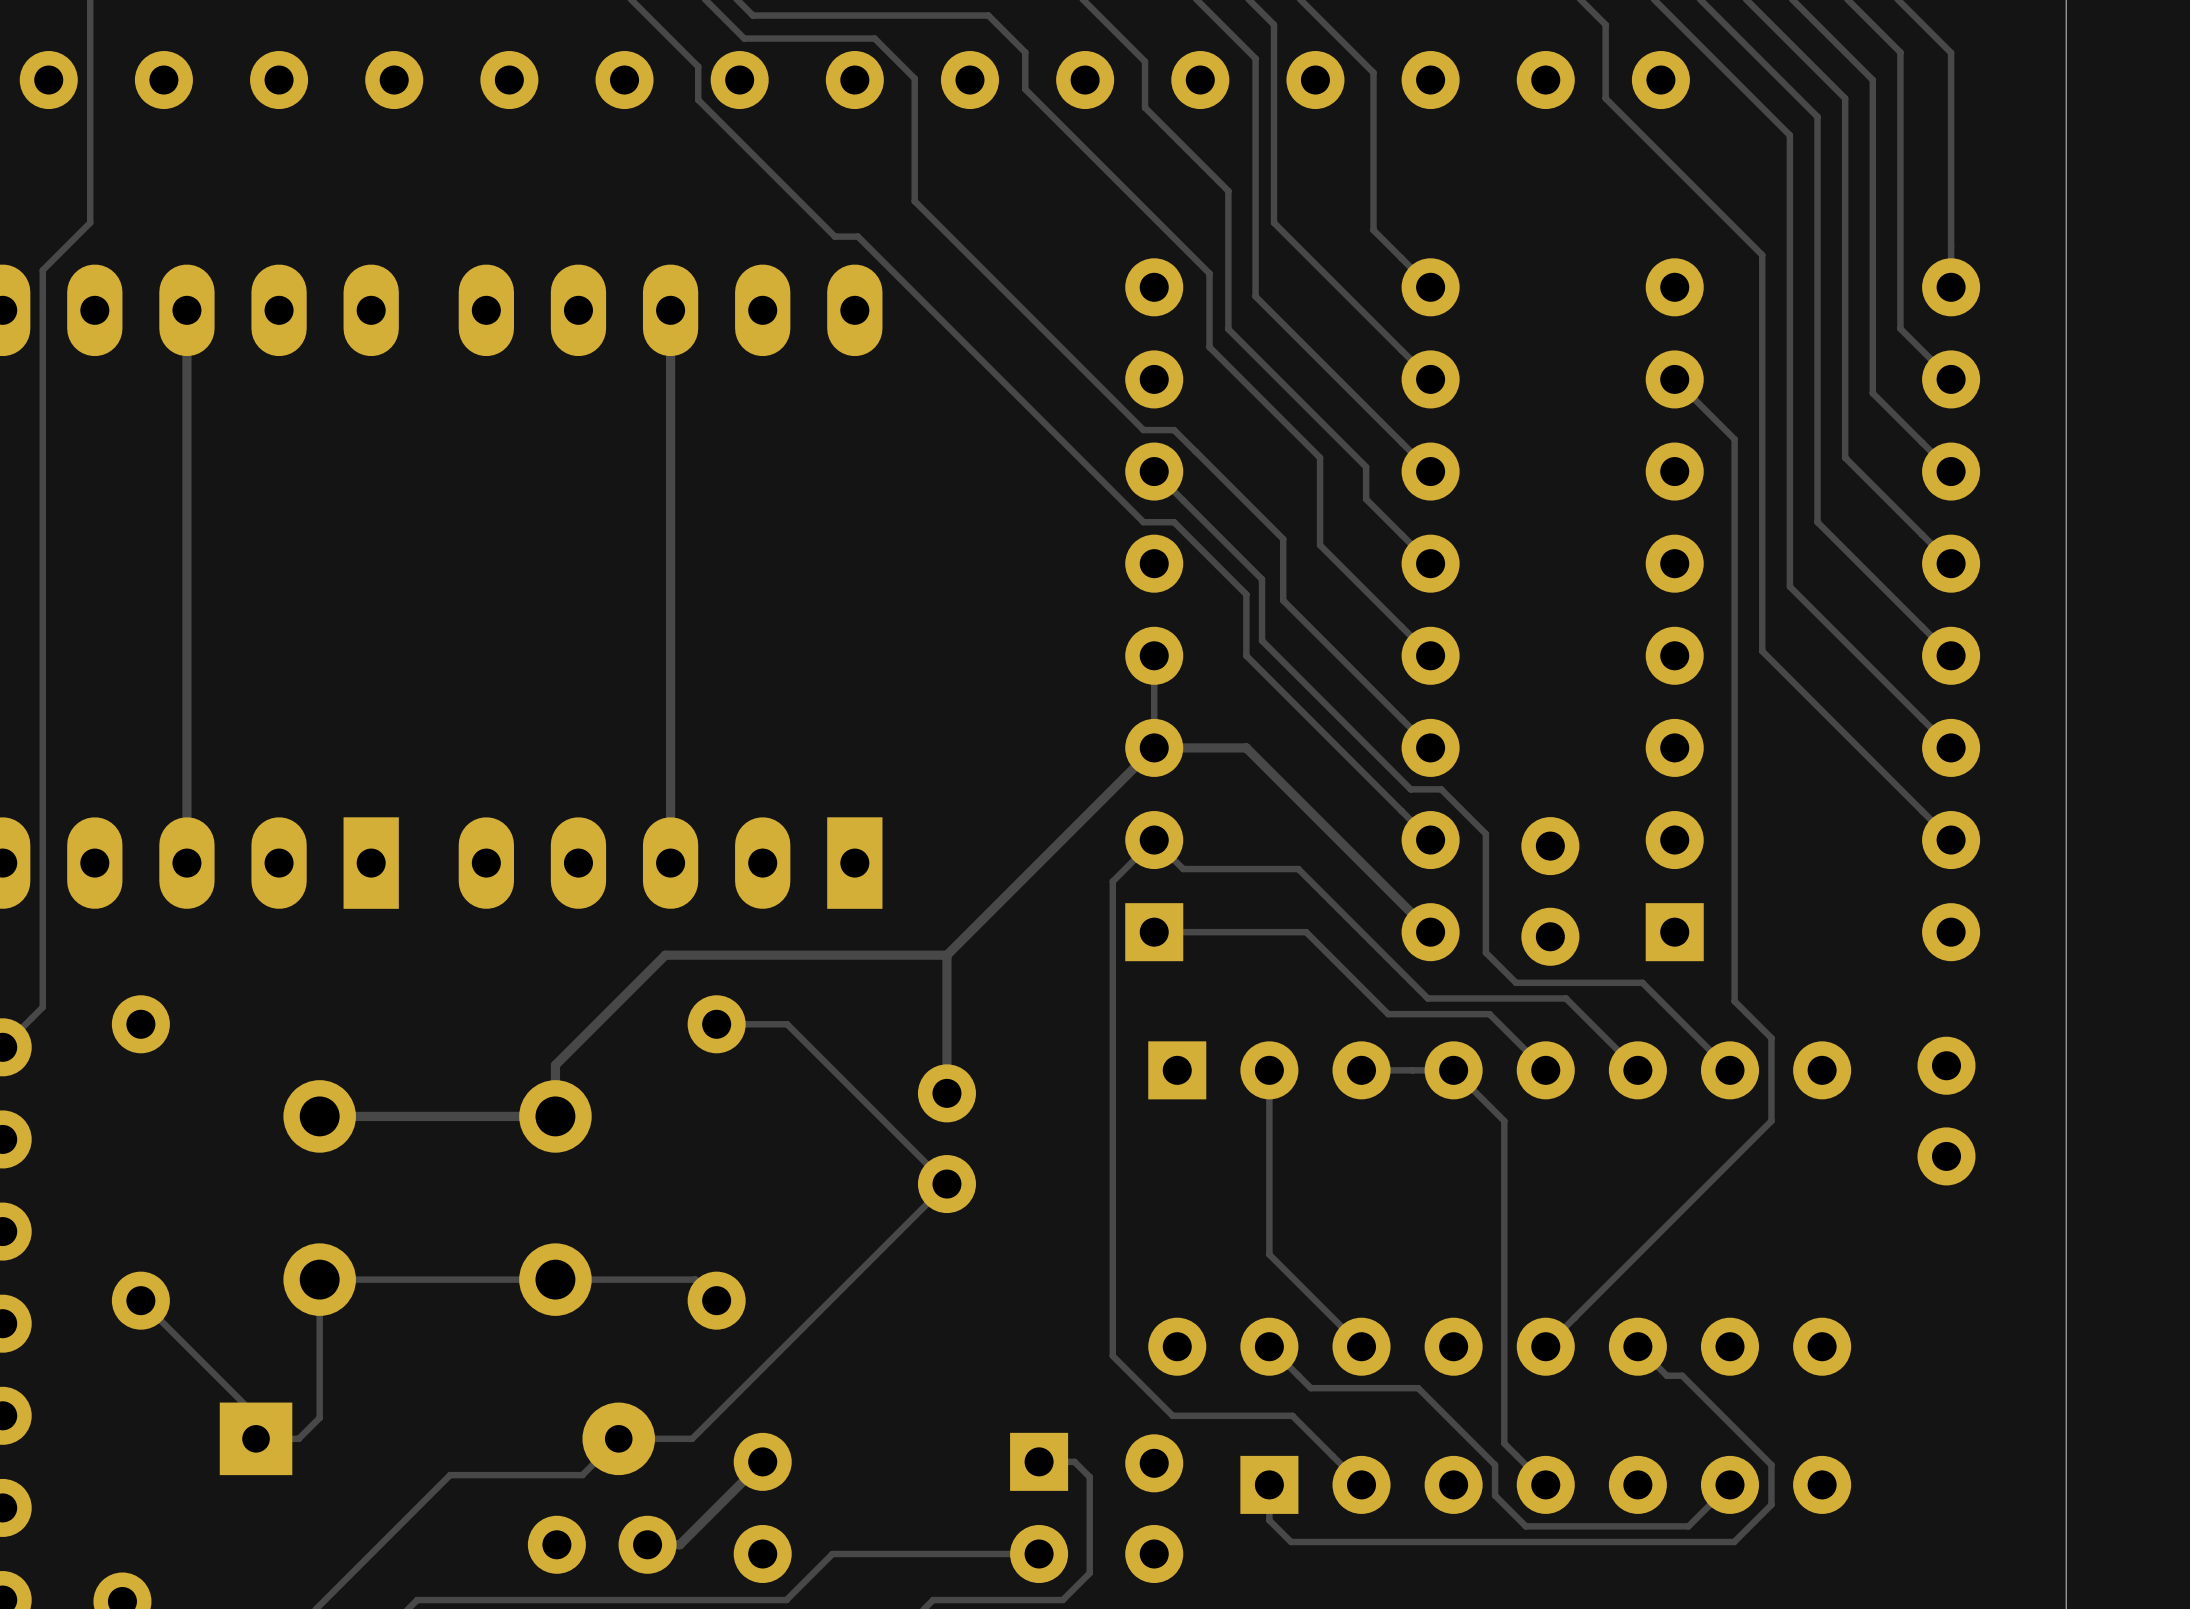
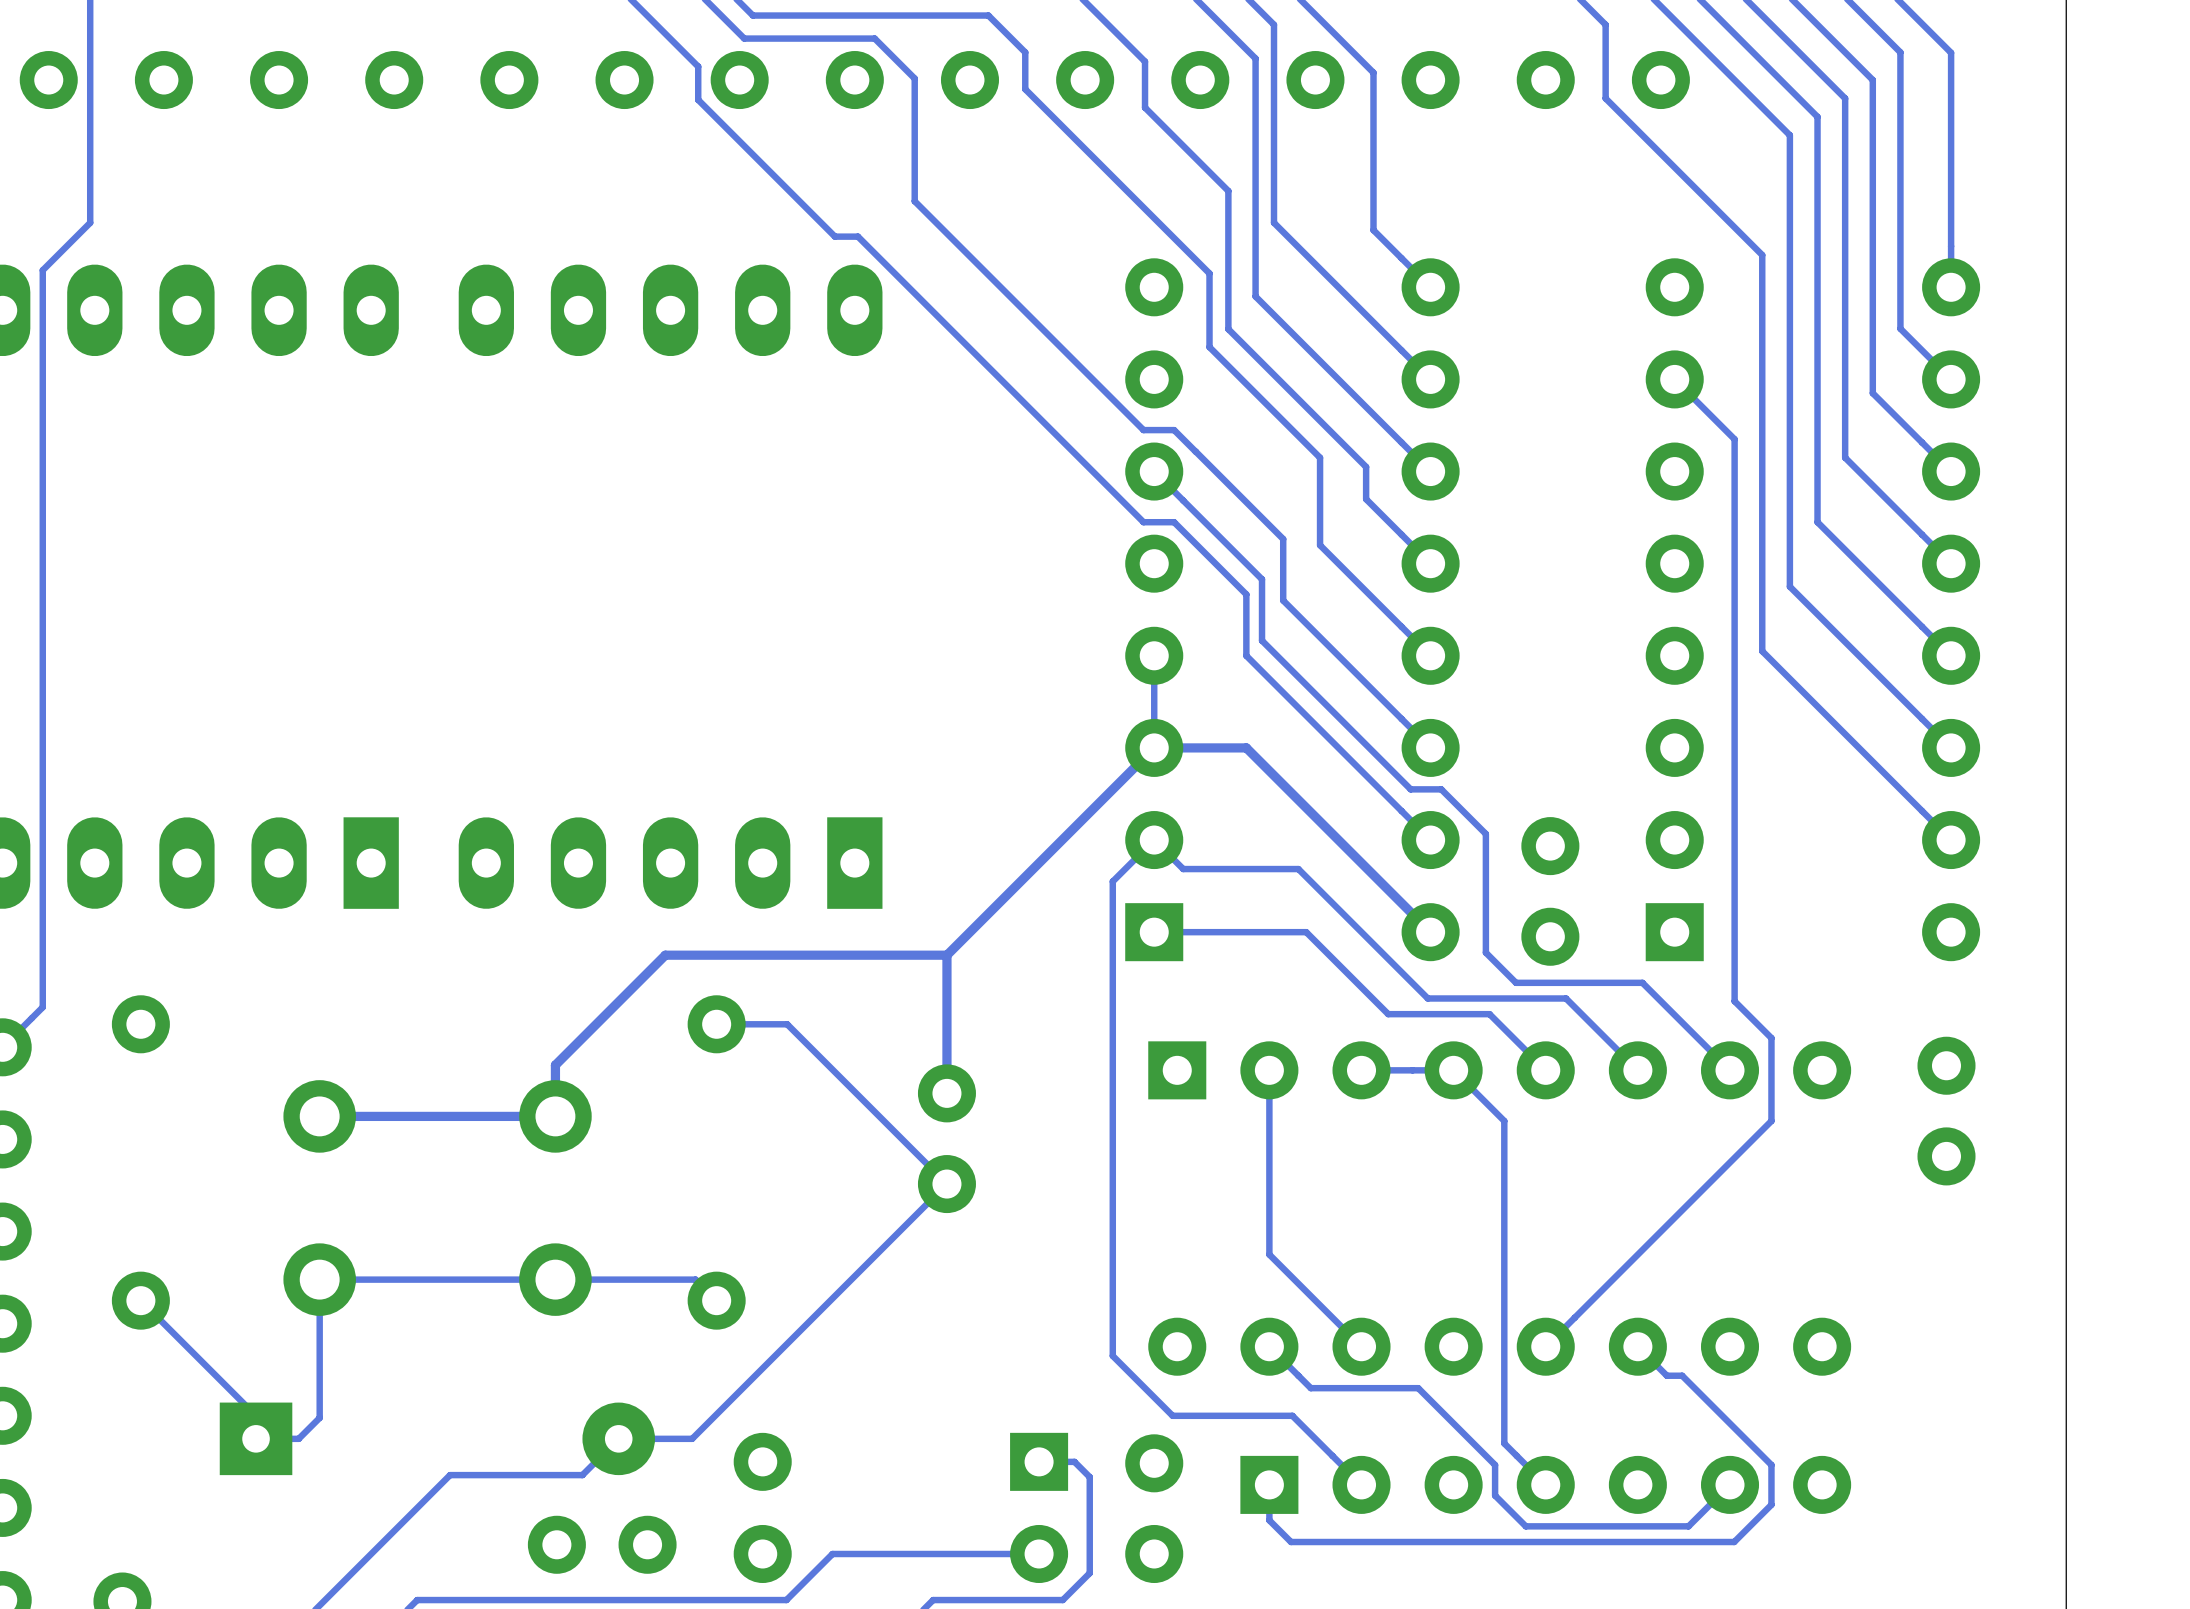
track: (186, 310) (186, 881) -> none
track: (670, 310) (670, 863) -> none
track: (762, 1461) (679, 1544) (647, 1544) -> none

